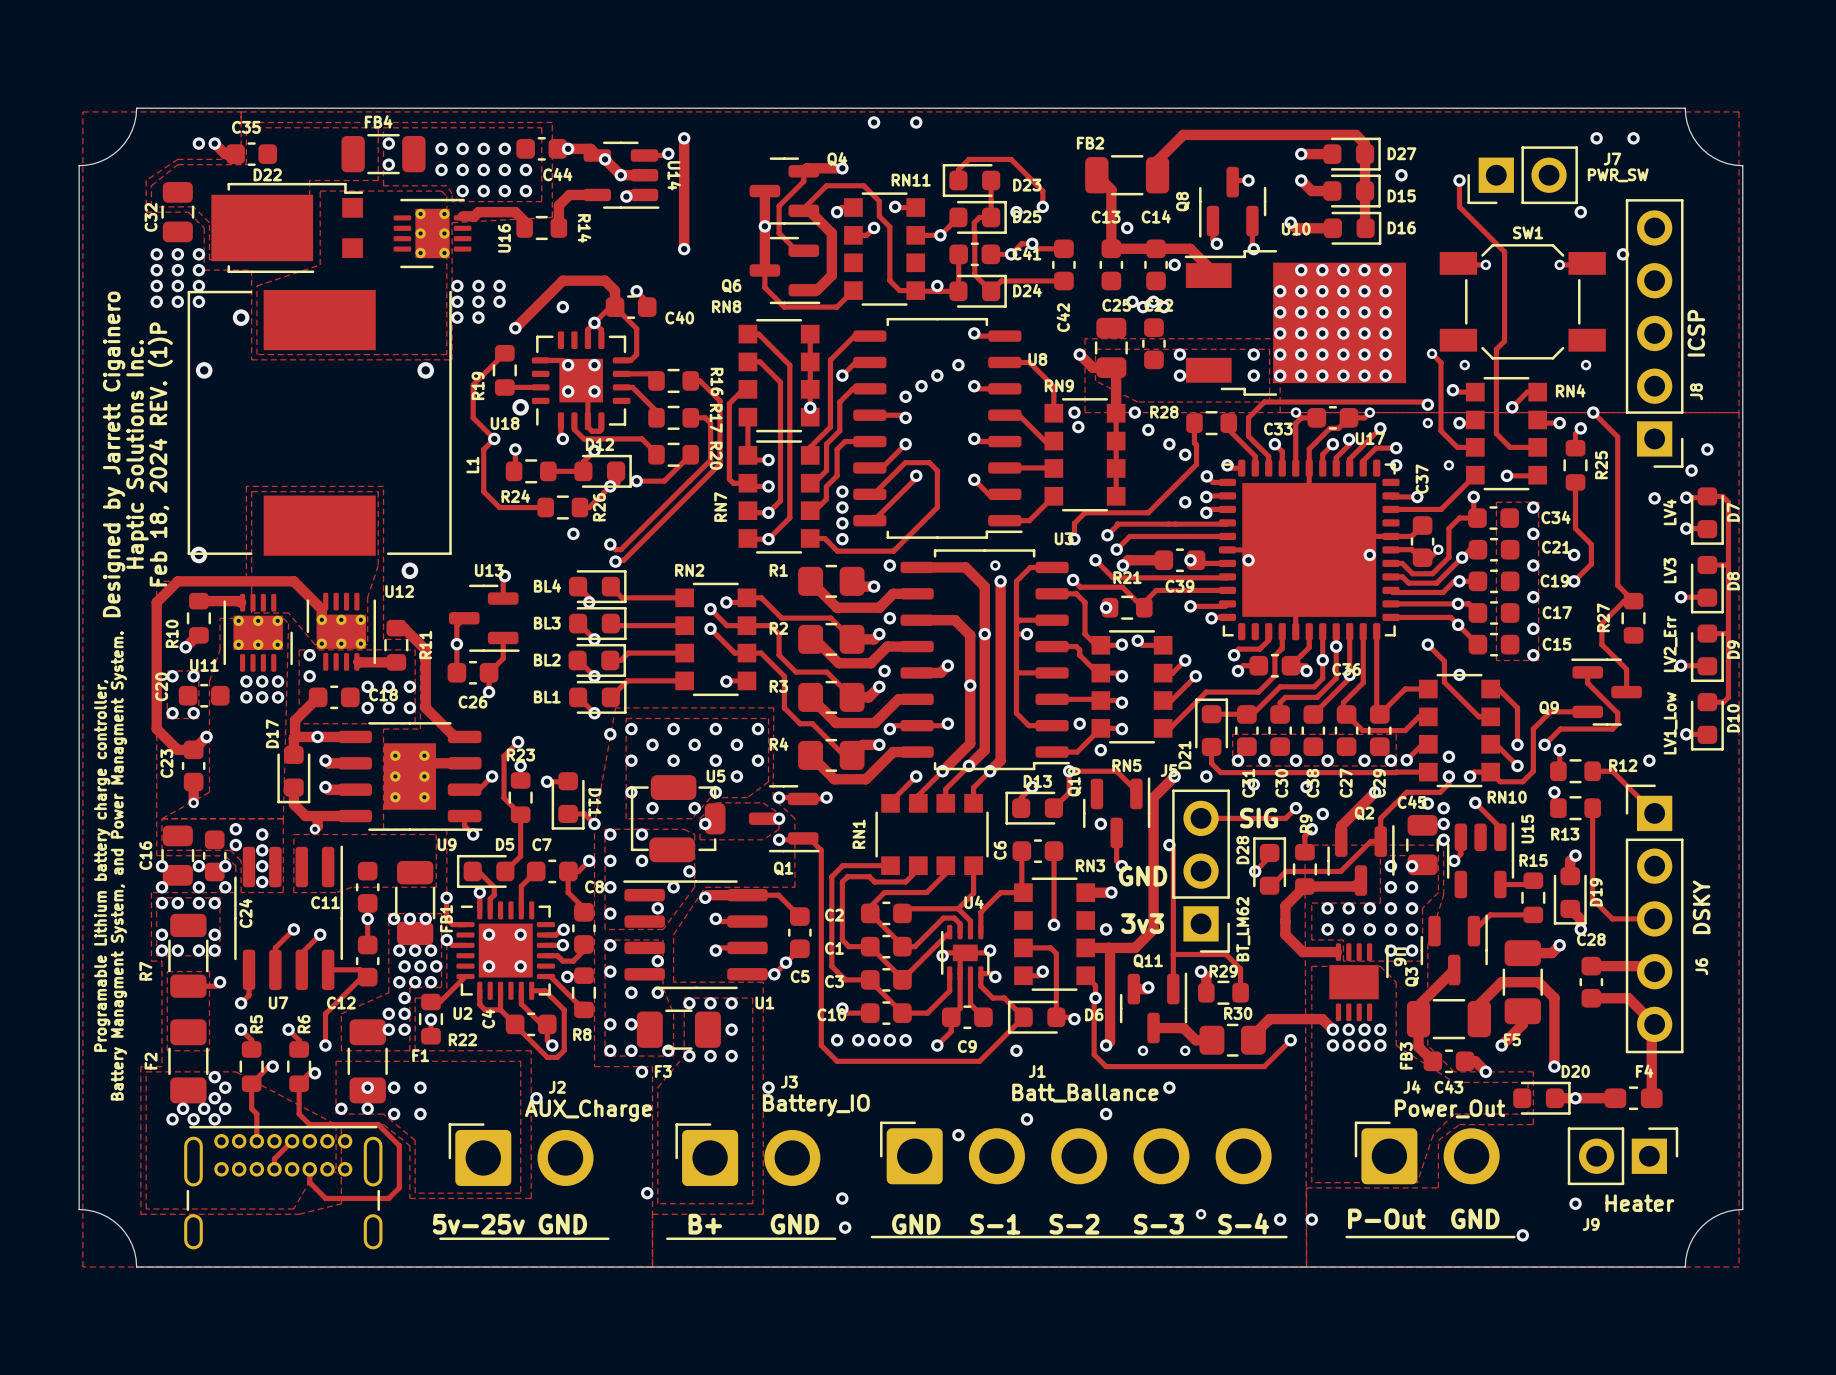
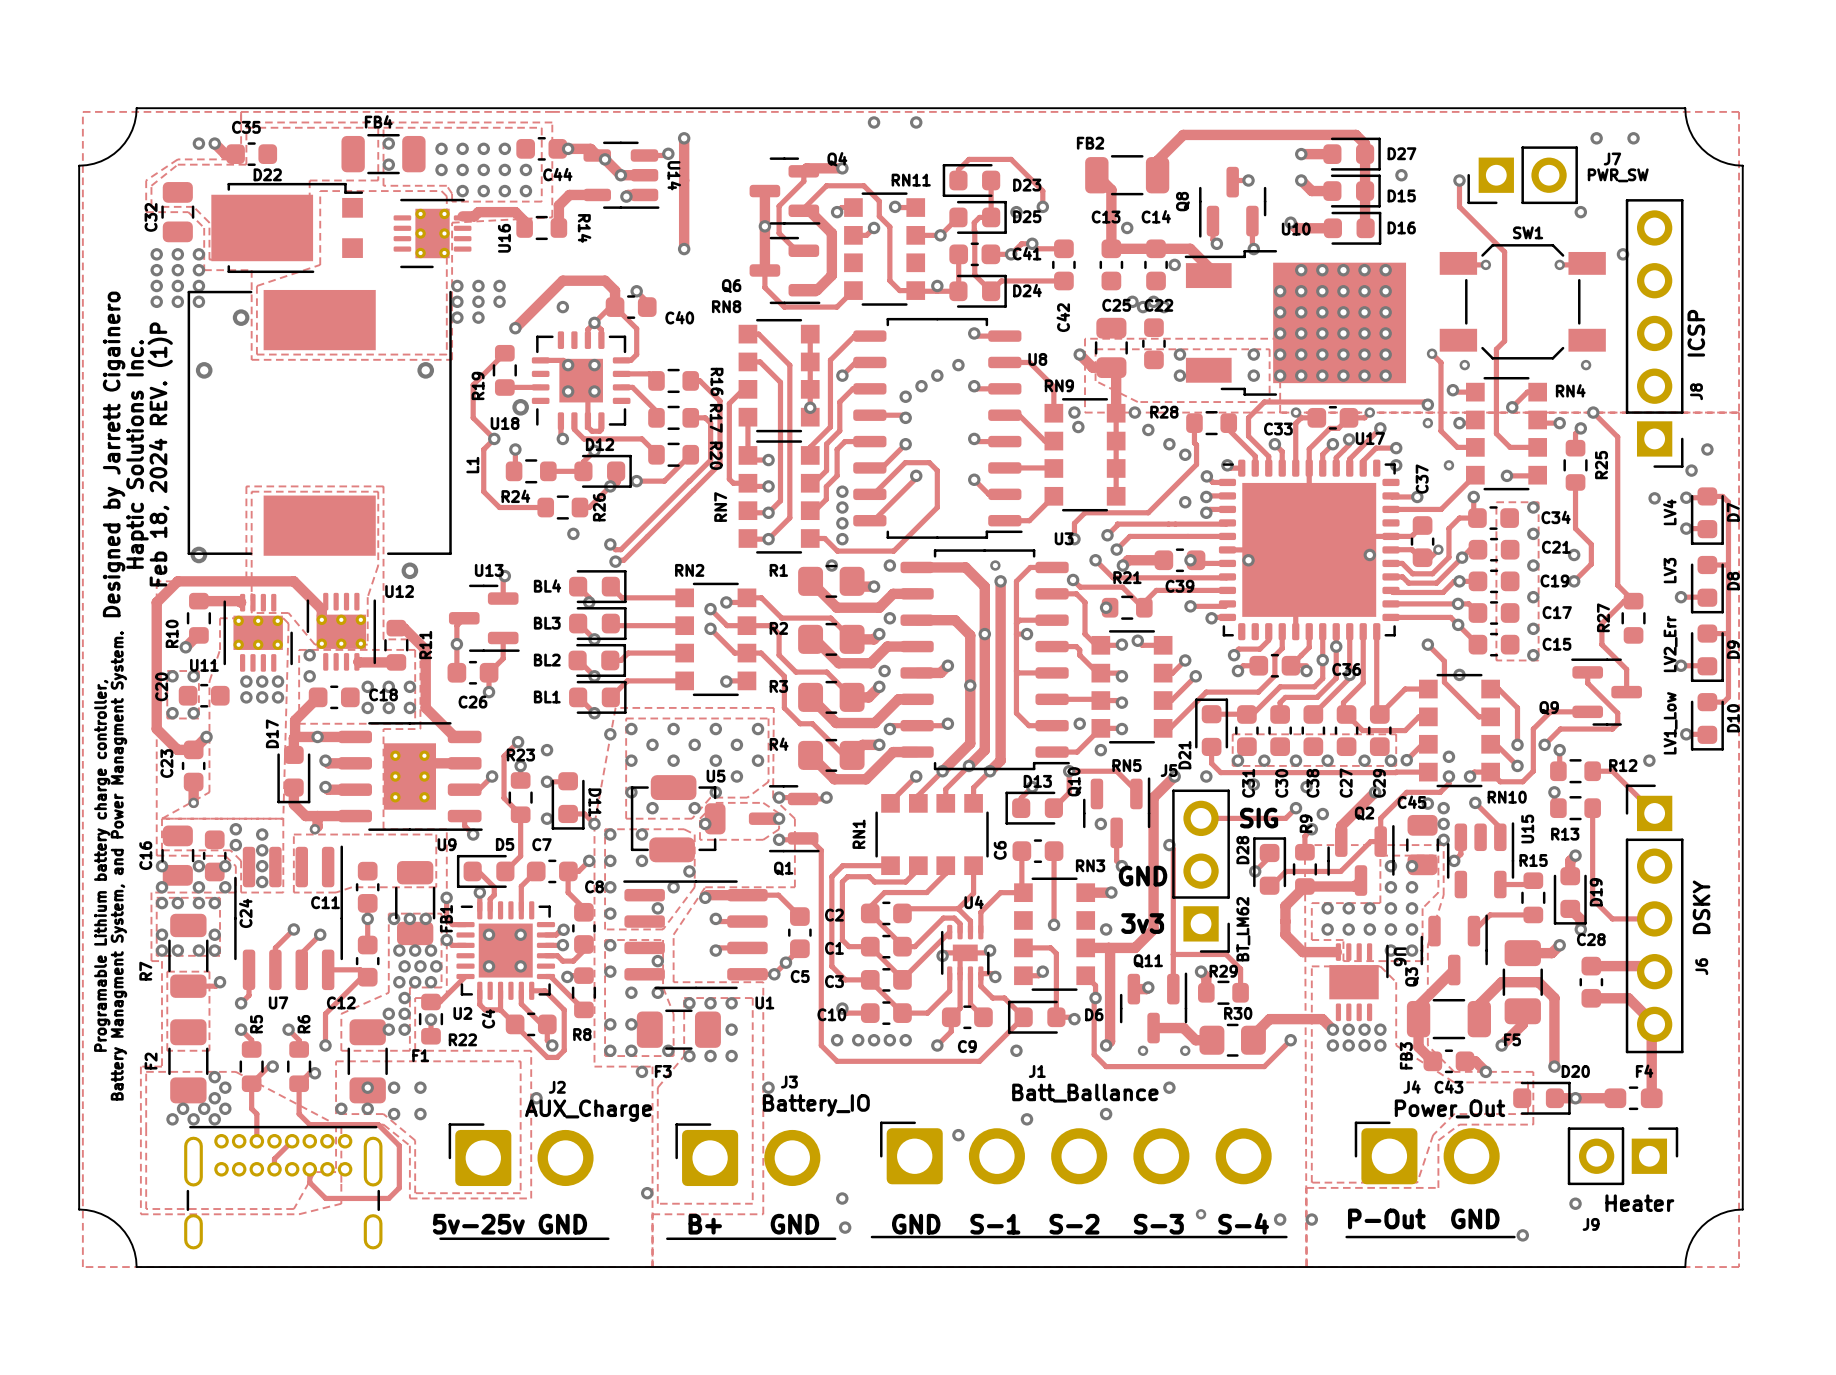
via: none -> (831, 565)
via: none -> (547, 750)
via: none -> (547, 818)

